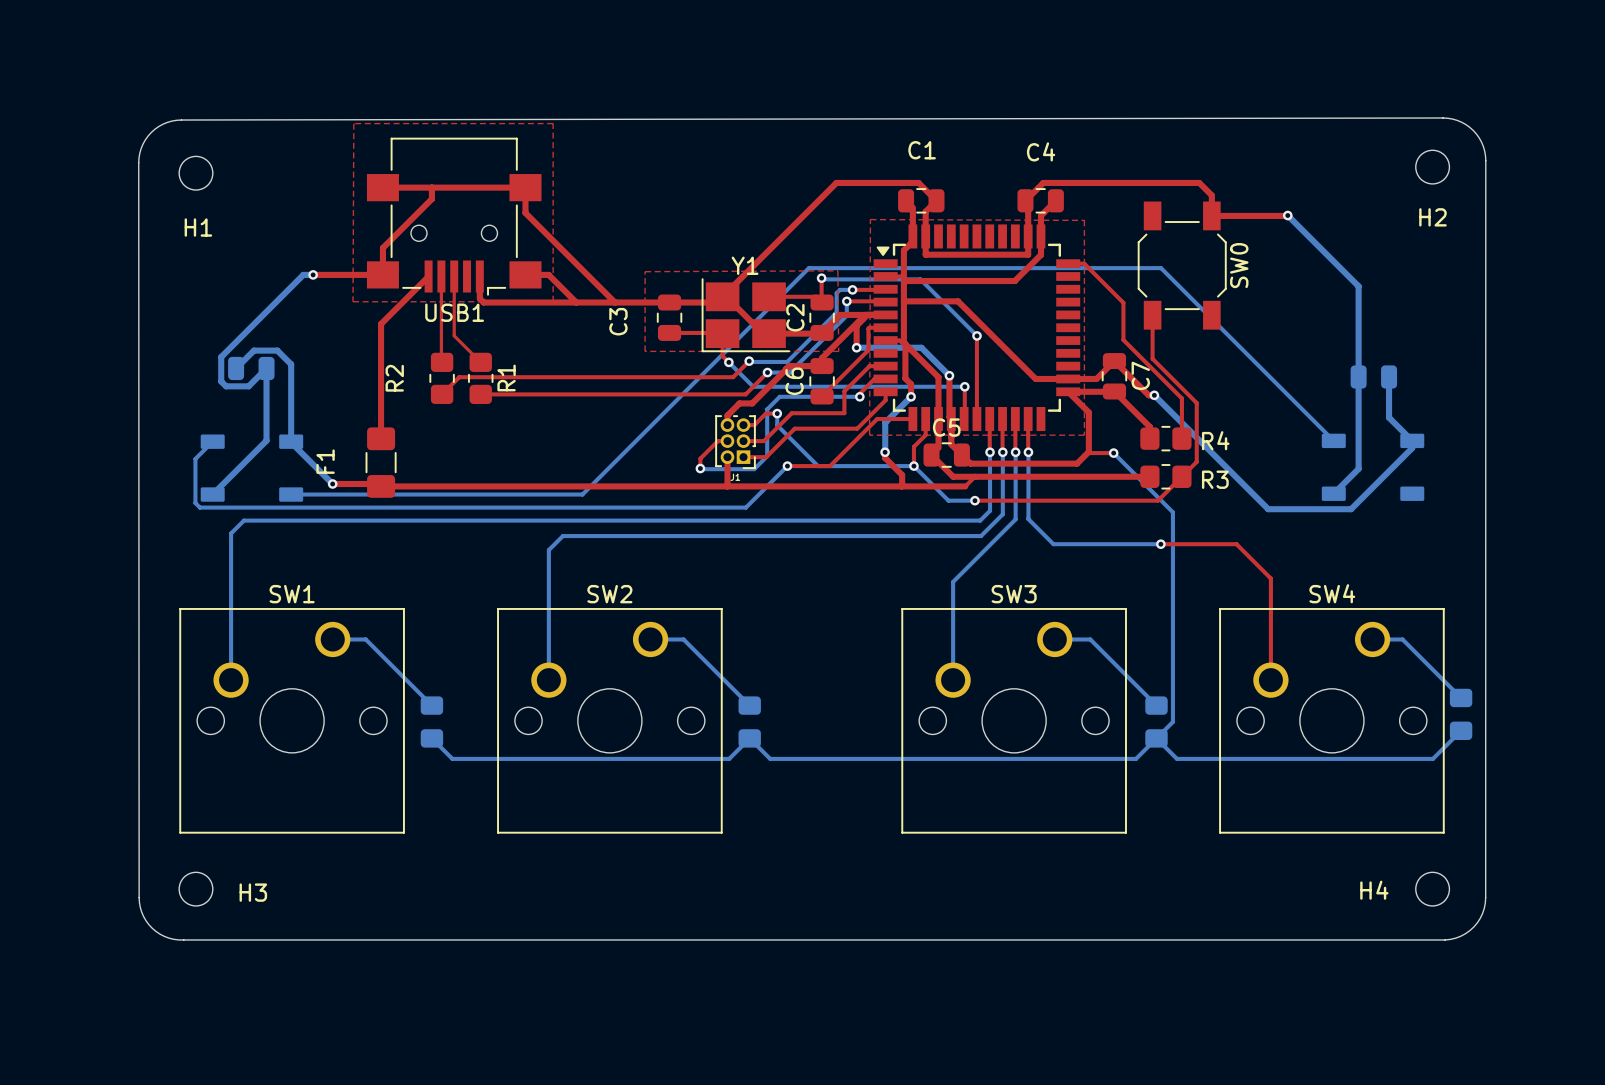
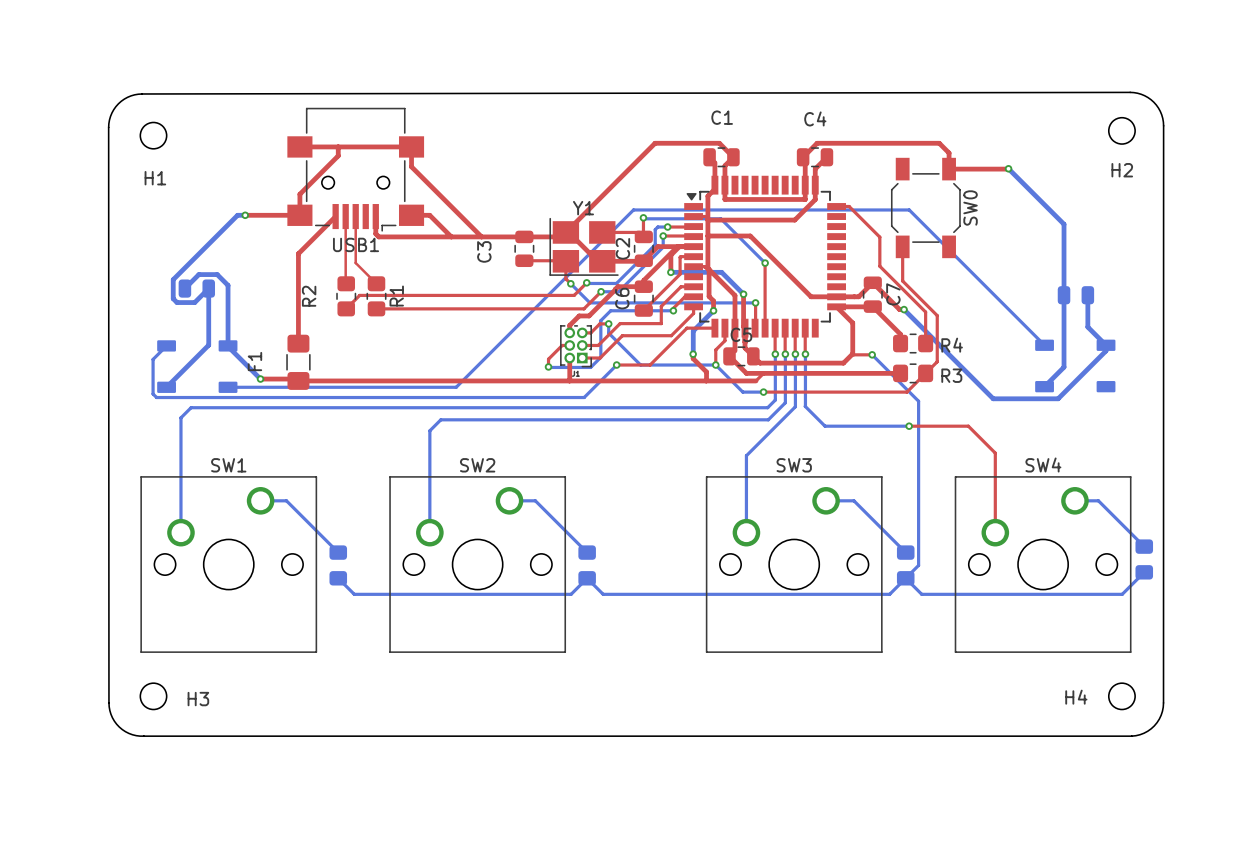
top zone outline: (353, 123) (353, 301) (553, 301) (553, 123) (353, 123) -> none
top zone outline: (870, 219) (1084, 220) (1084, 435) (869, 435) (870, 219) -> none
top zone outline: (837, 270) (645, 271) (645, 351) (838, 351) (837, 270) -> none

